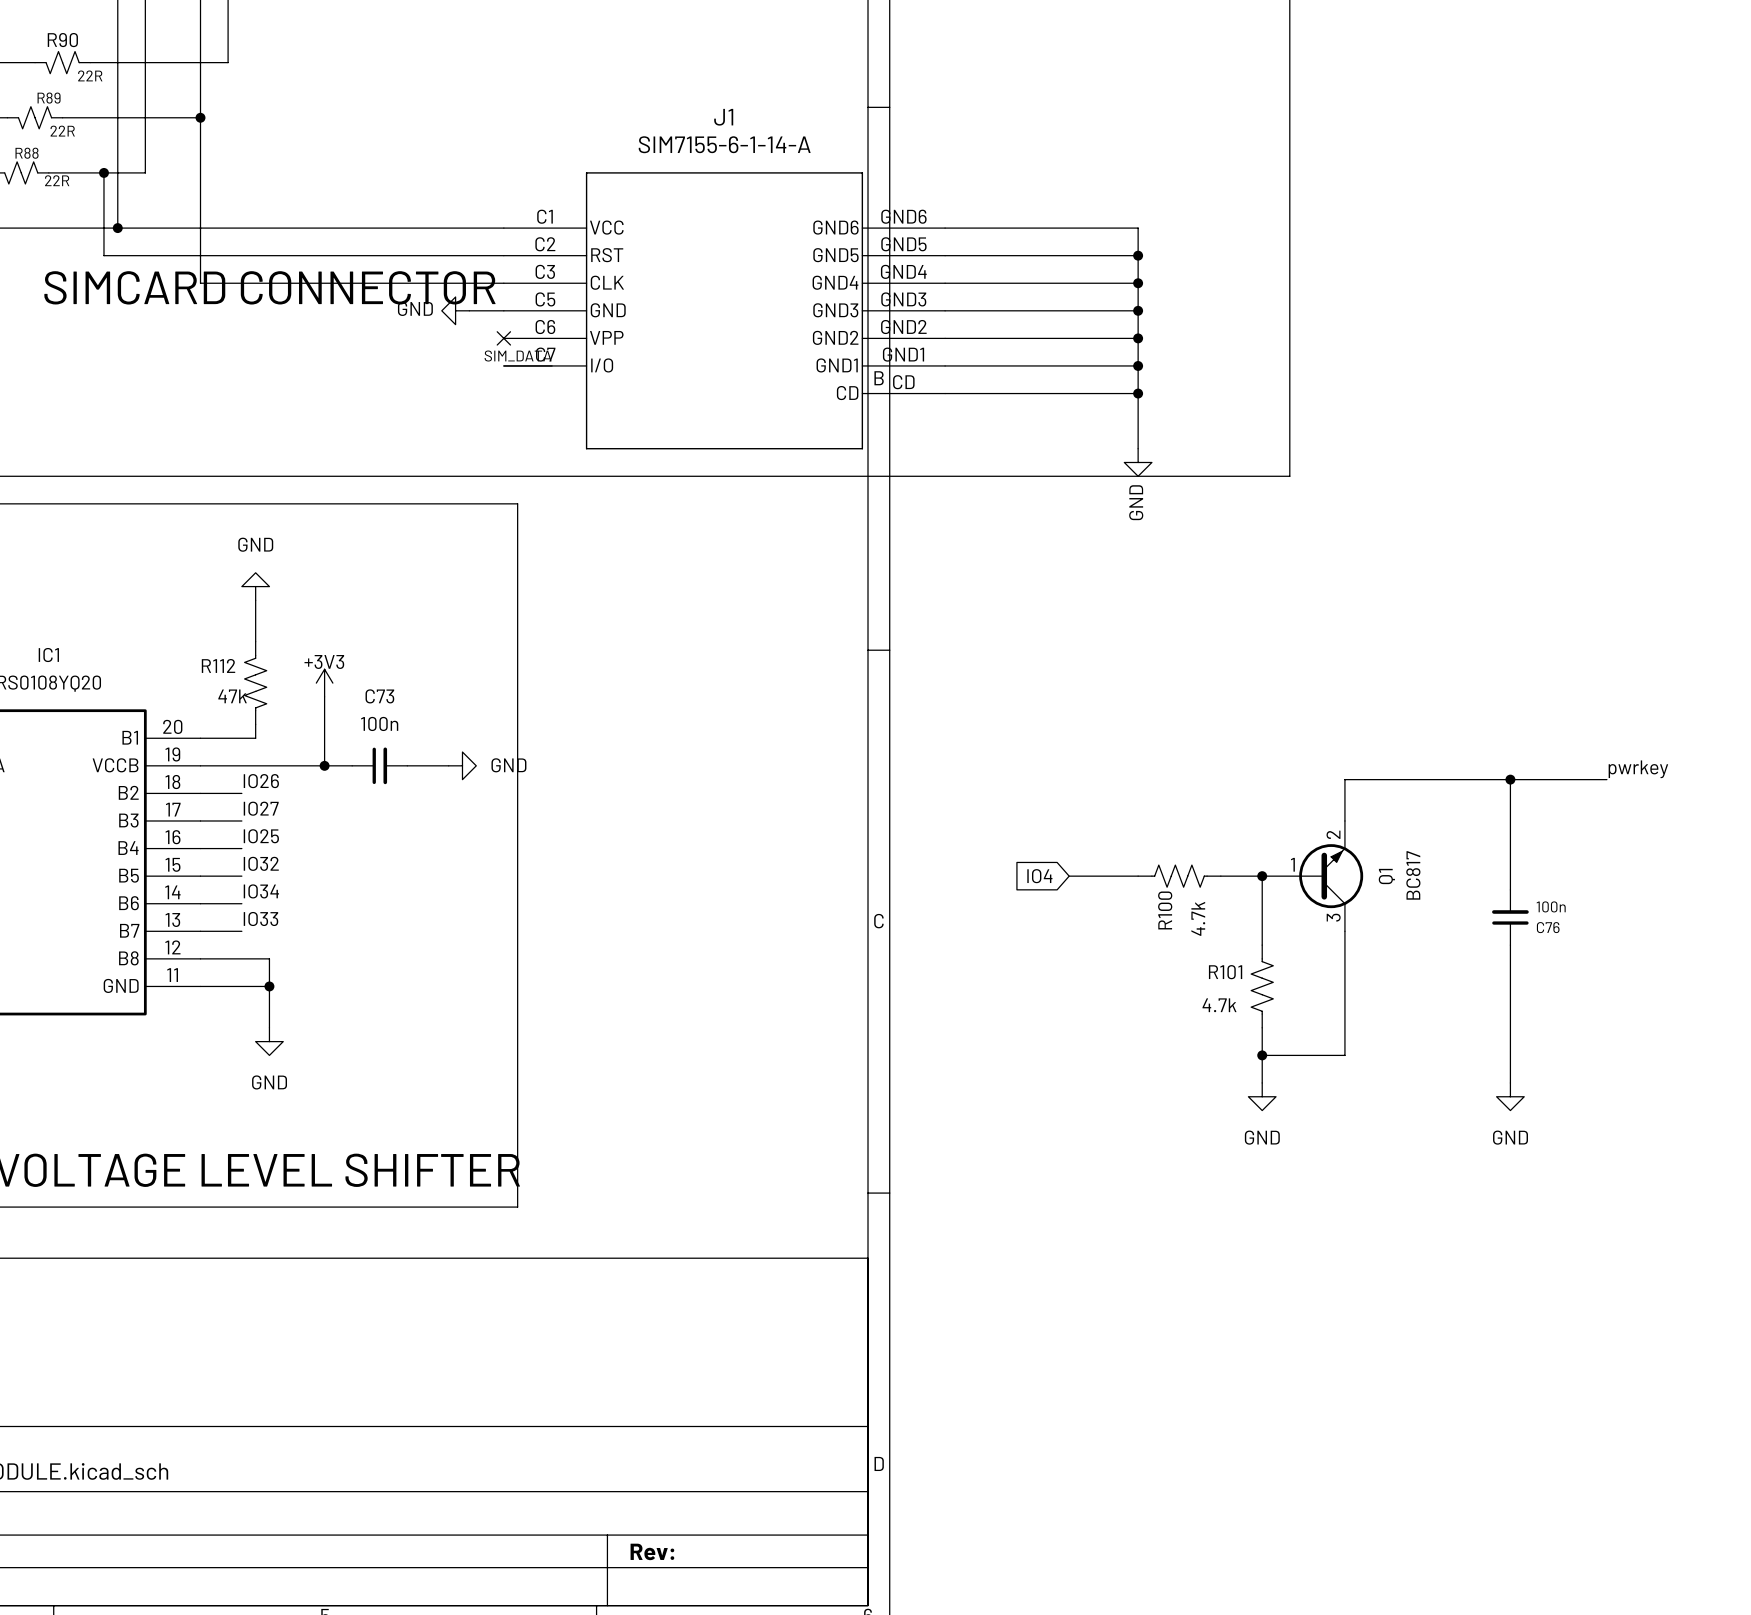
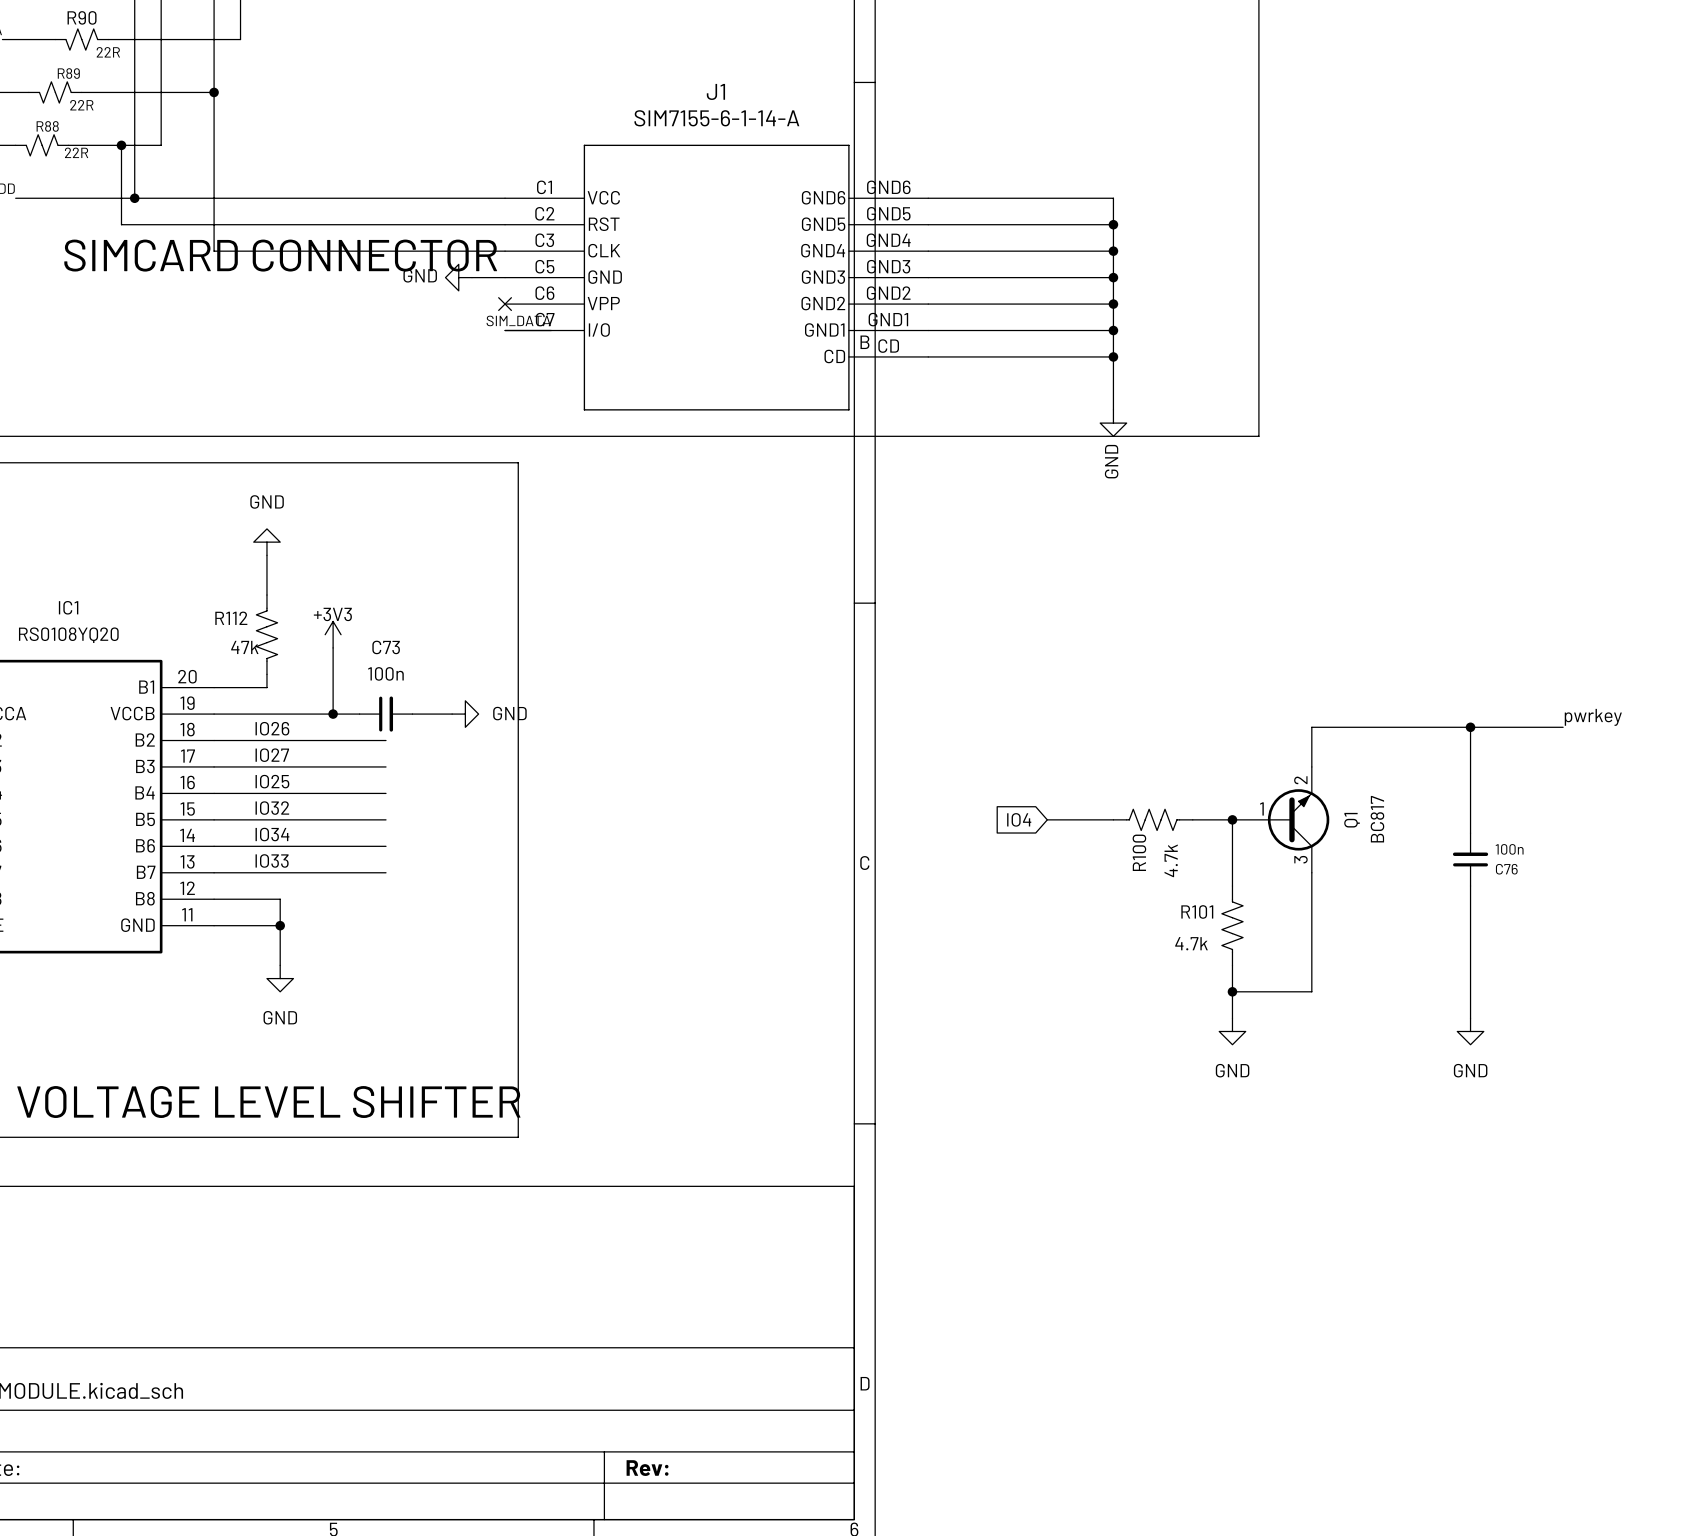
wire: none -> (253, 740) (386, 740)
wire: none -> (253, 766) (386, 766)
wire: none -> (253, 793) (386, 793)
wire: none -> (253, 819) (386, 819)
wire: none -> (253, 846) (386, 846)
wire: none -> (253, 872) (386, 872)

